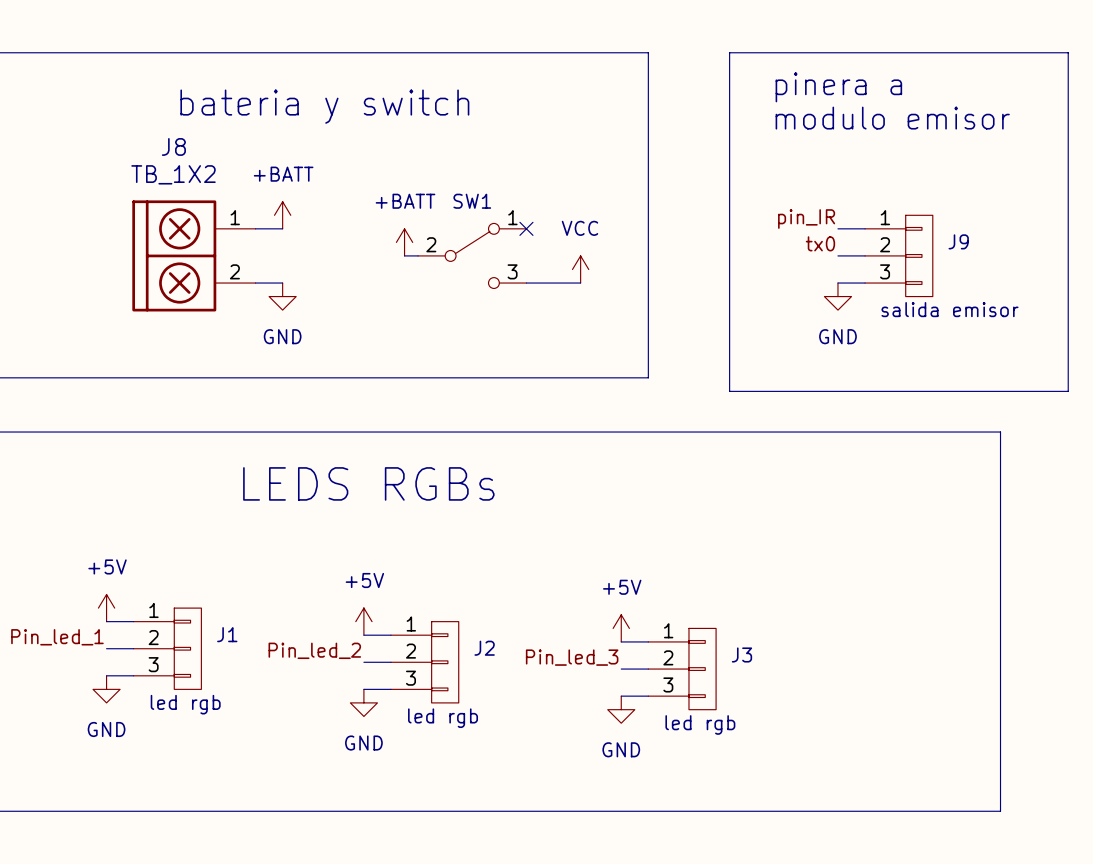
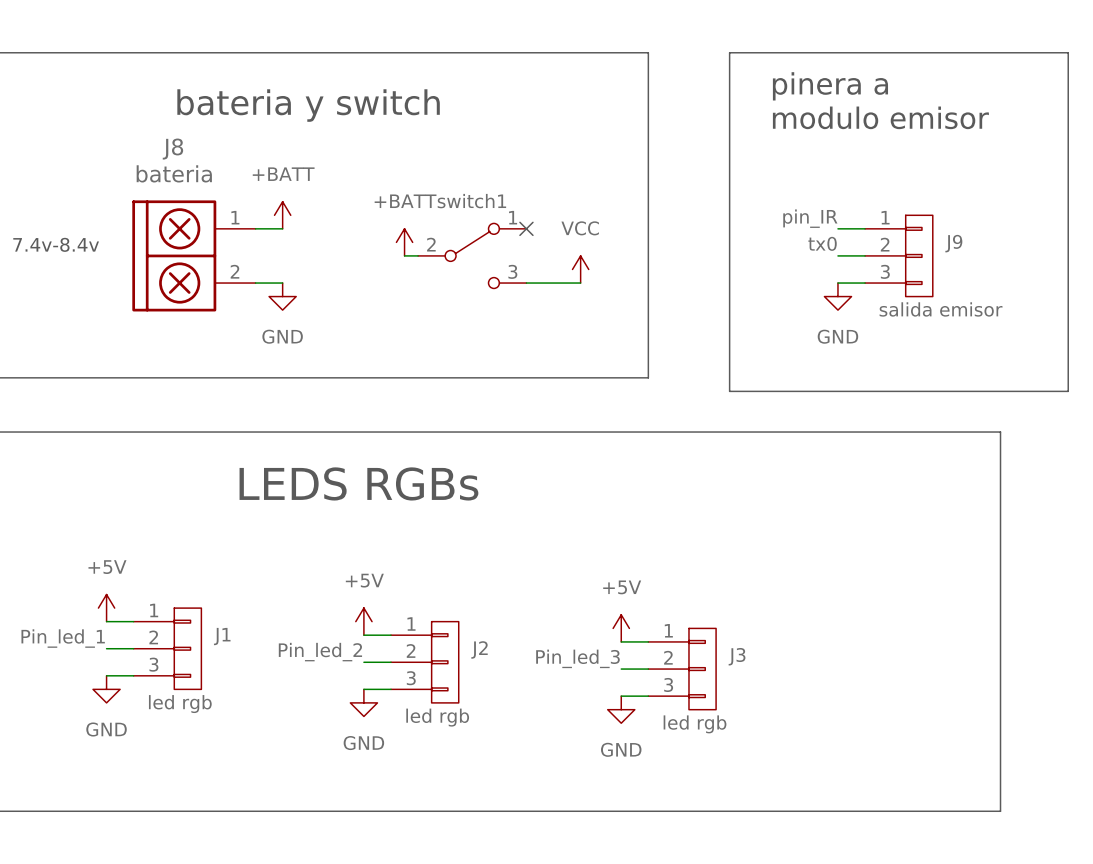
J8 value: TB_1X2 (173, 174) -> bateria (174, 173)
SW1 name: SW1 (472, 201) -> switch1 (471, 201)
text: none -> 7.4v-8.4v (56, 244)

